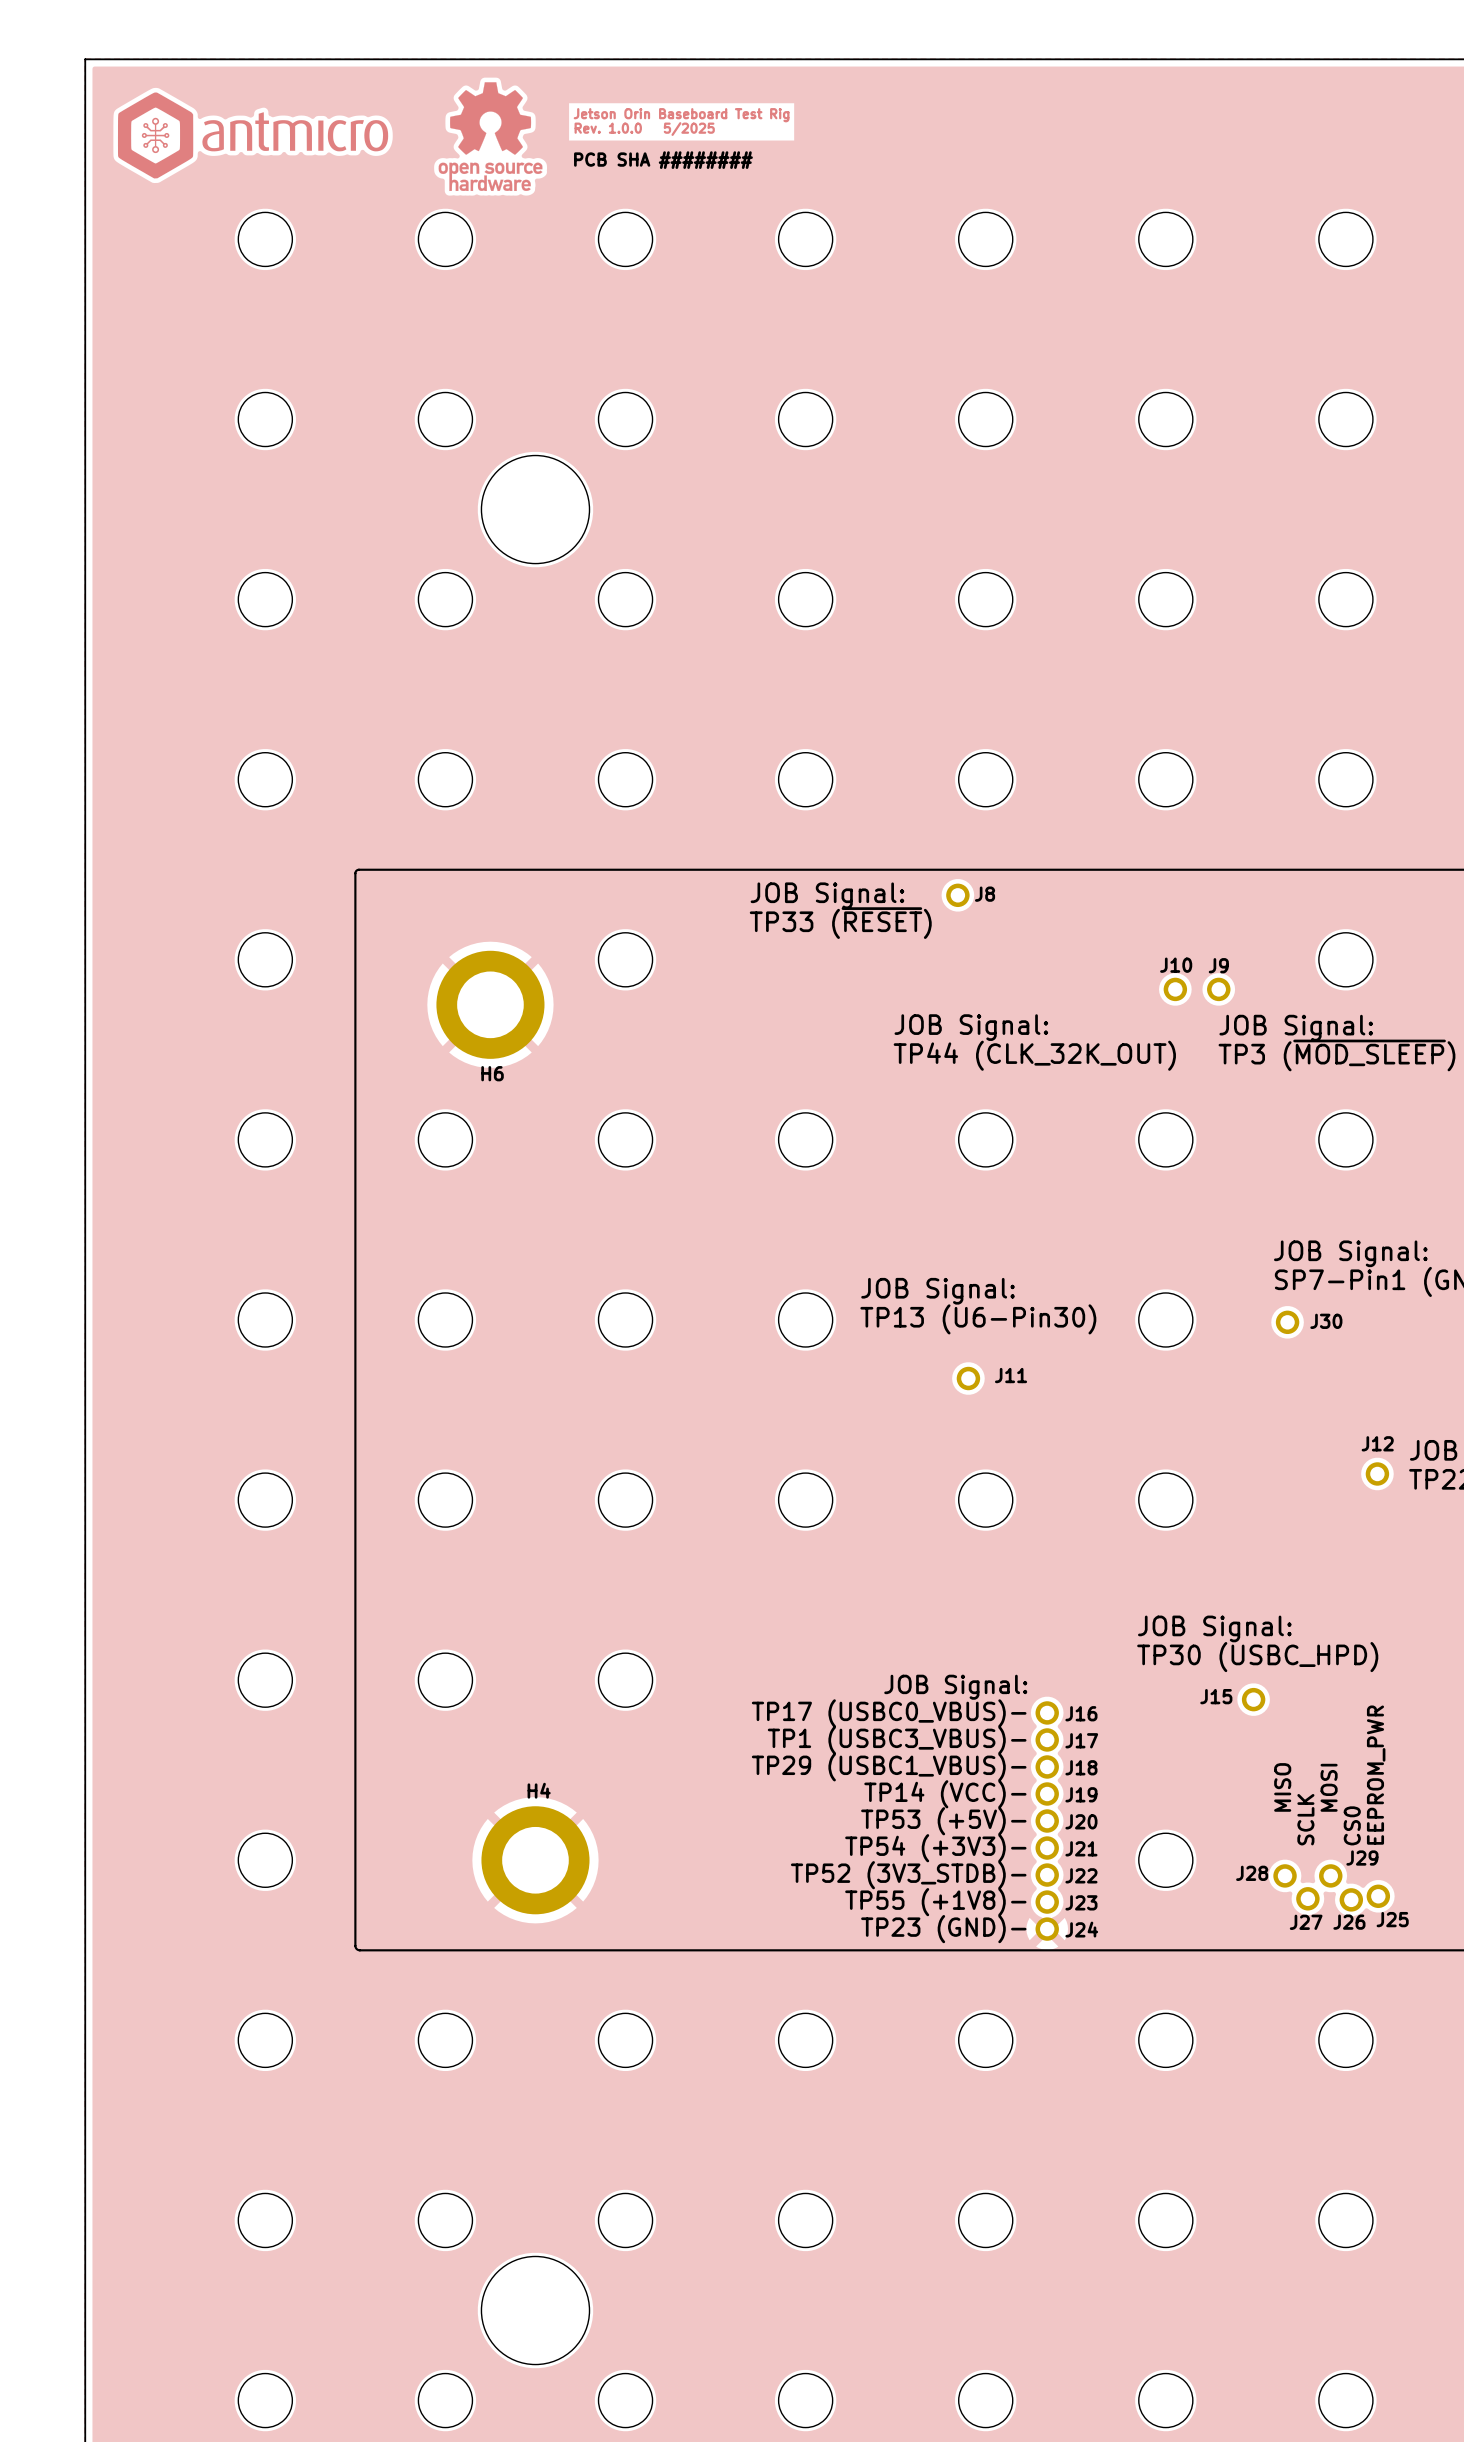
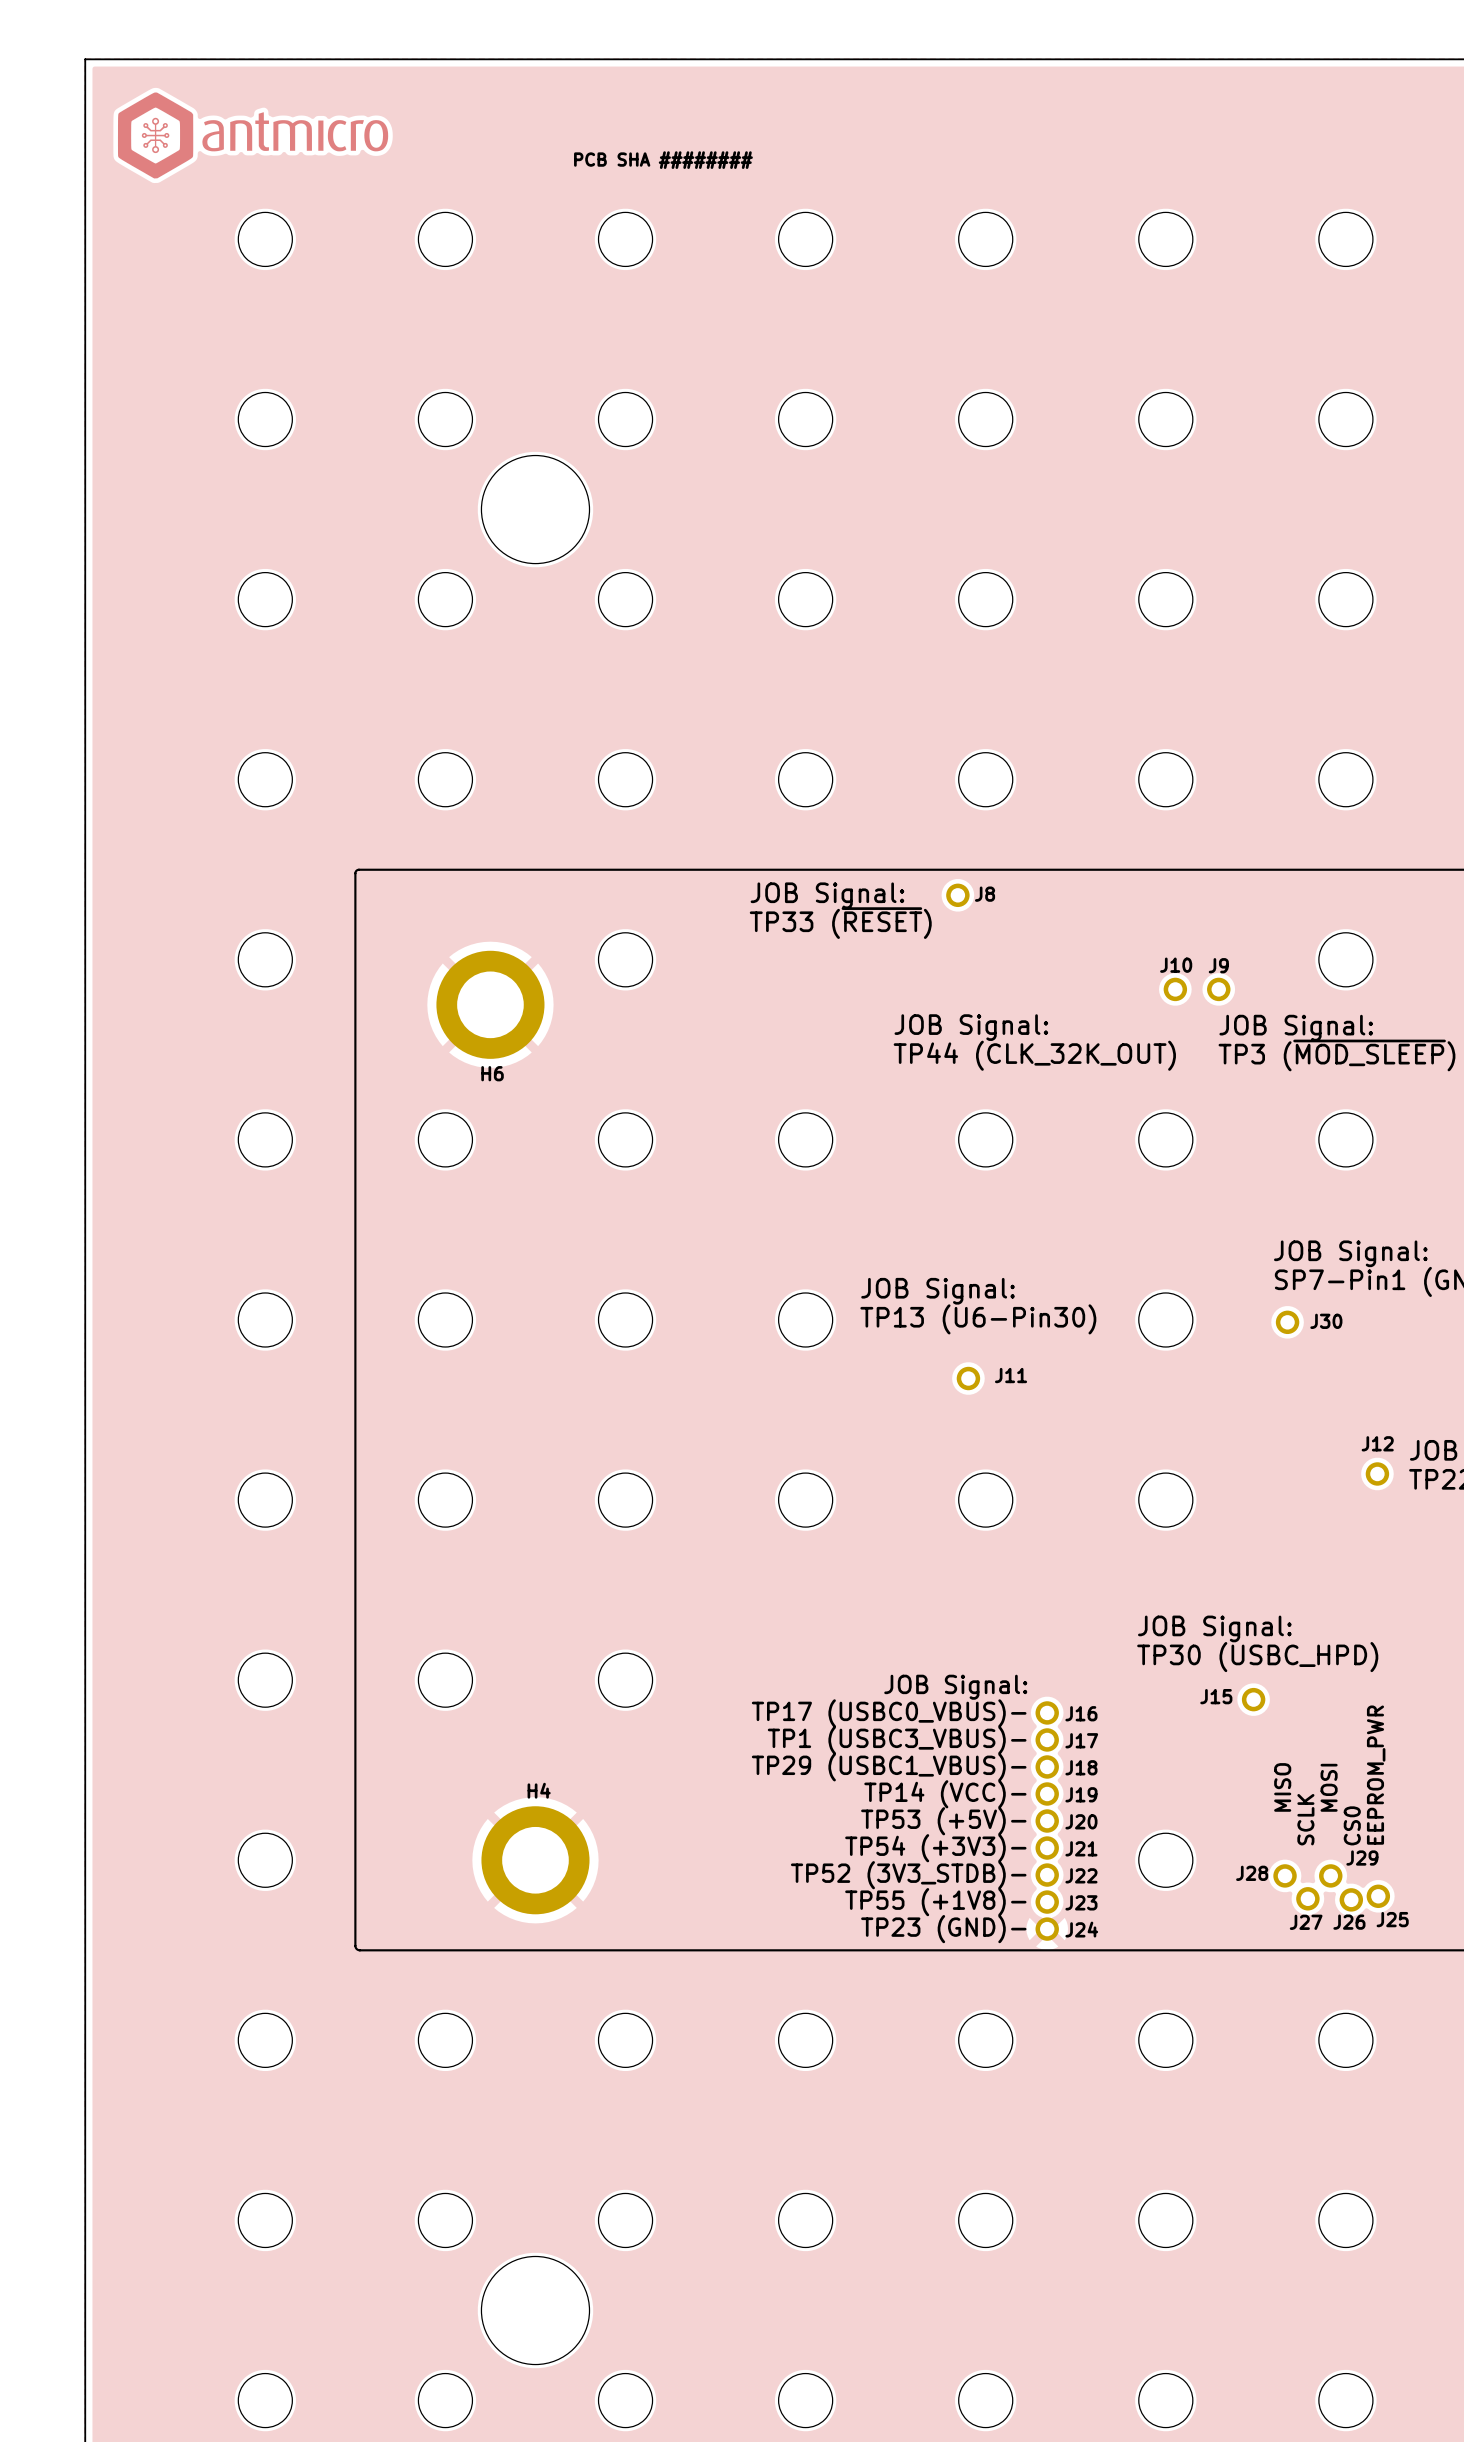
drawing: [438, 82, 543, 192] -> none
text: Jetson Orin Baseboard Test Rig (681, 115) -> none
text: Rev. 1.0.0 5/2025 (644, 129) -> none

